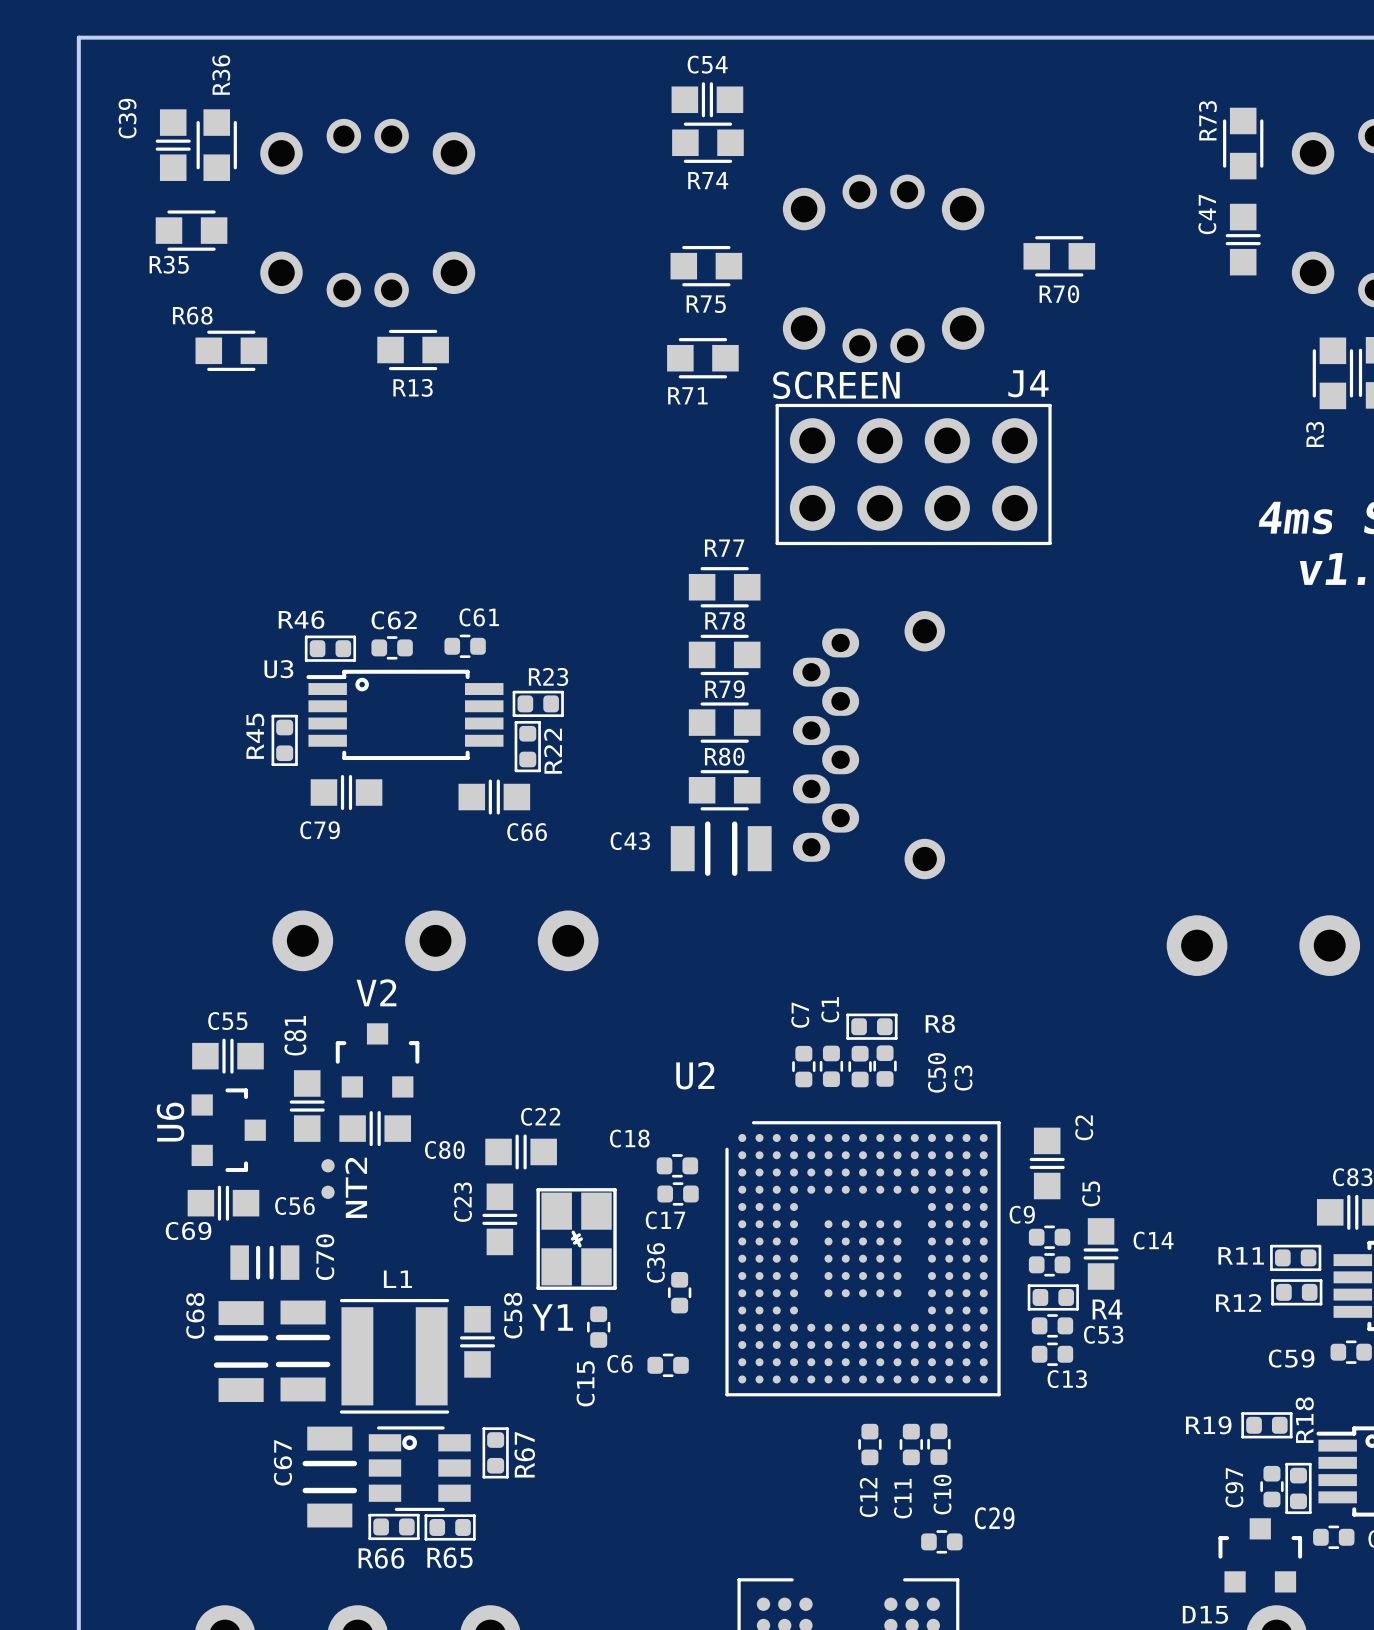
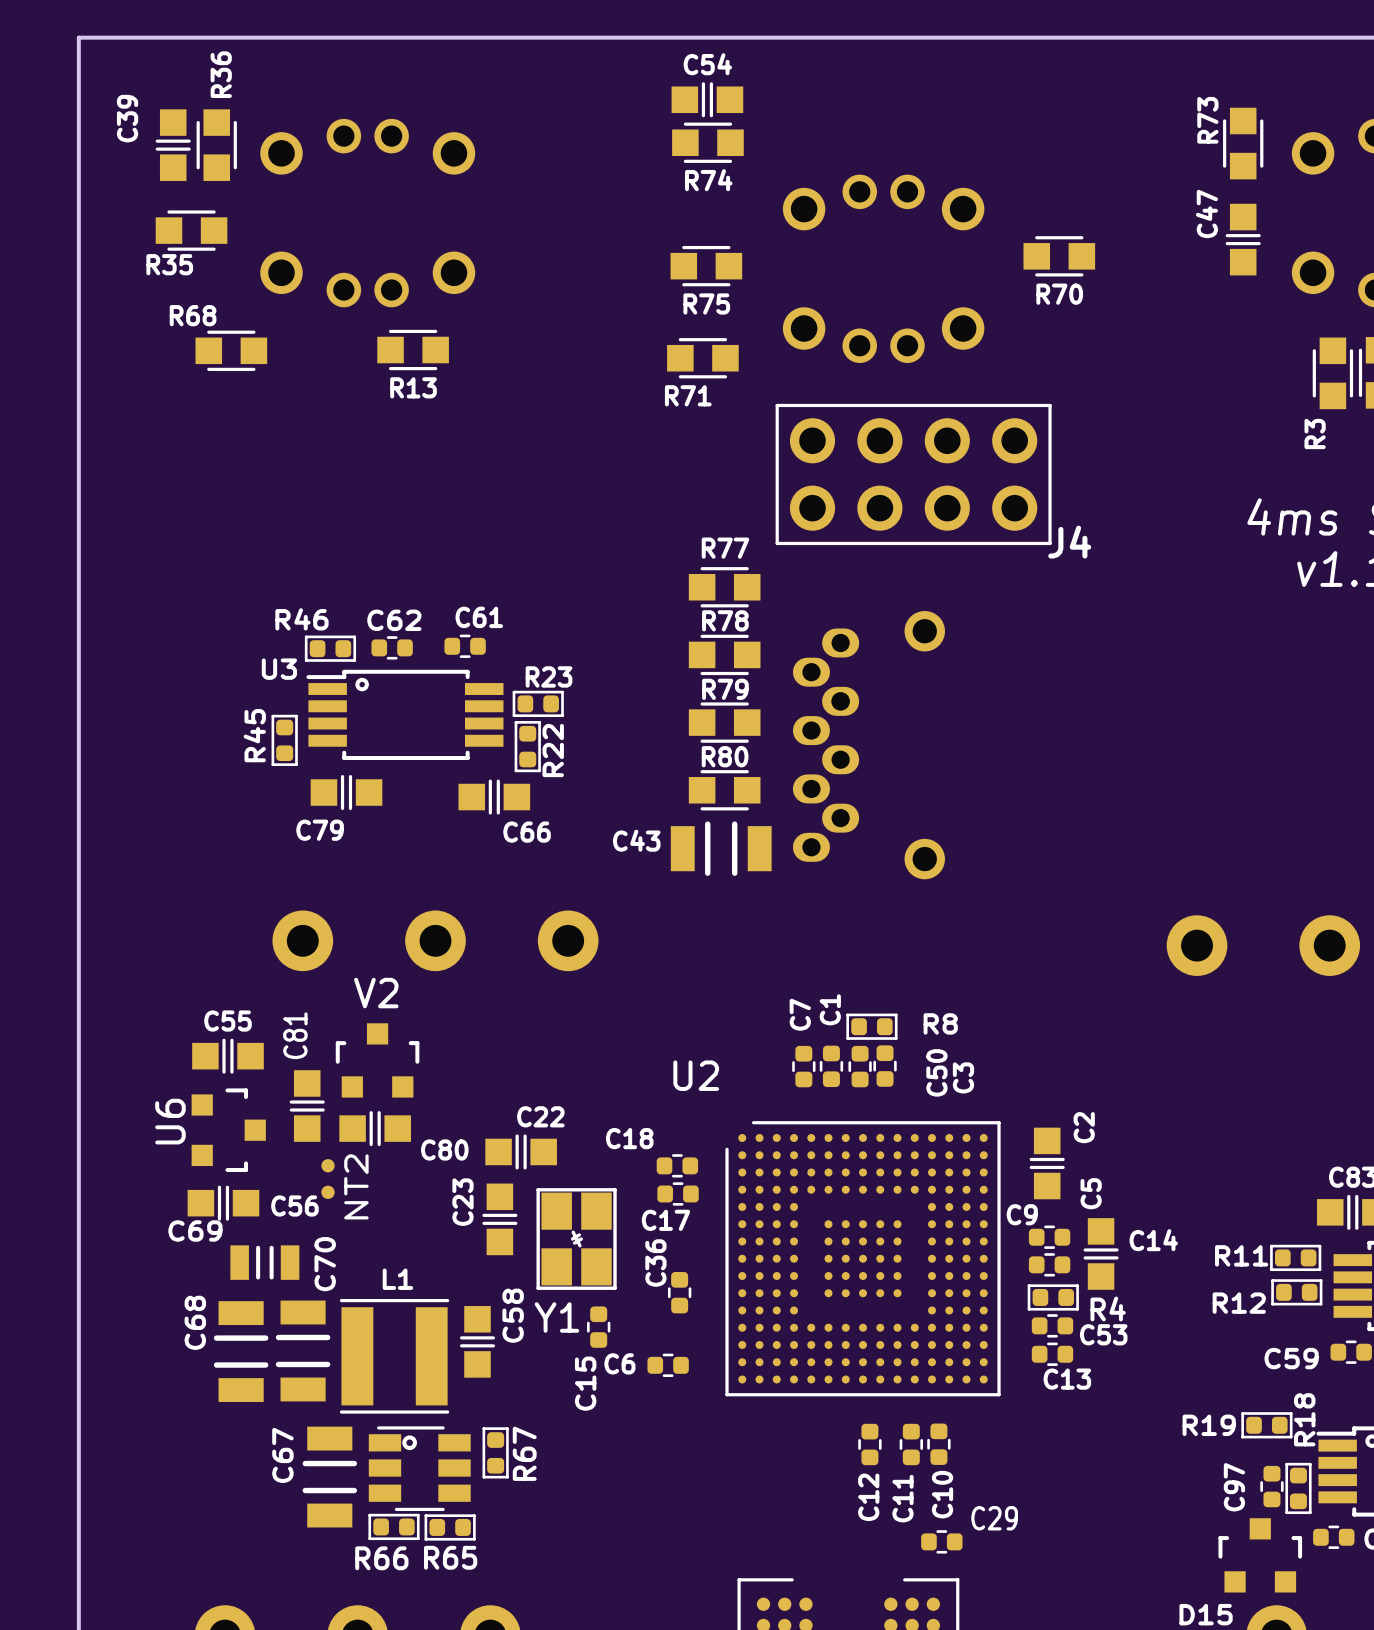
J4 name position: J4 (1028, 383) -> J4 (1069, 542)
text: SCREEN (836, 385) -> none

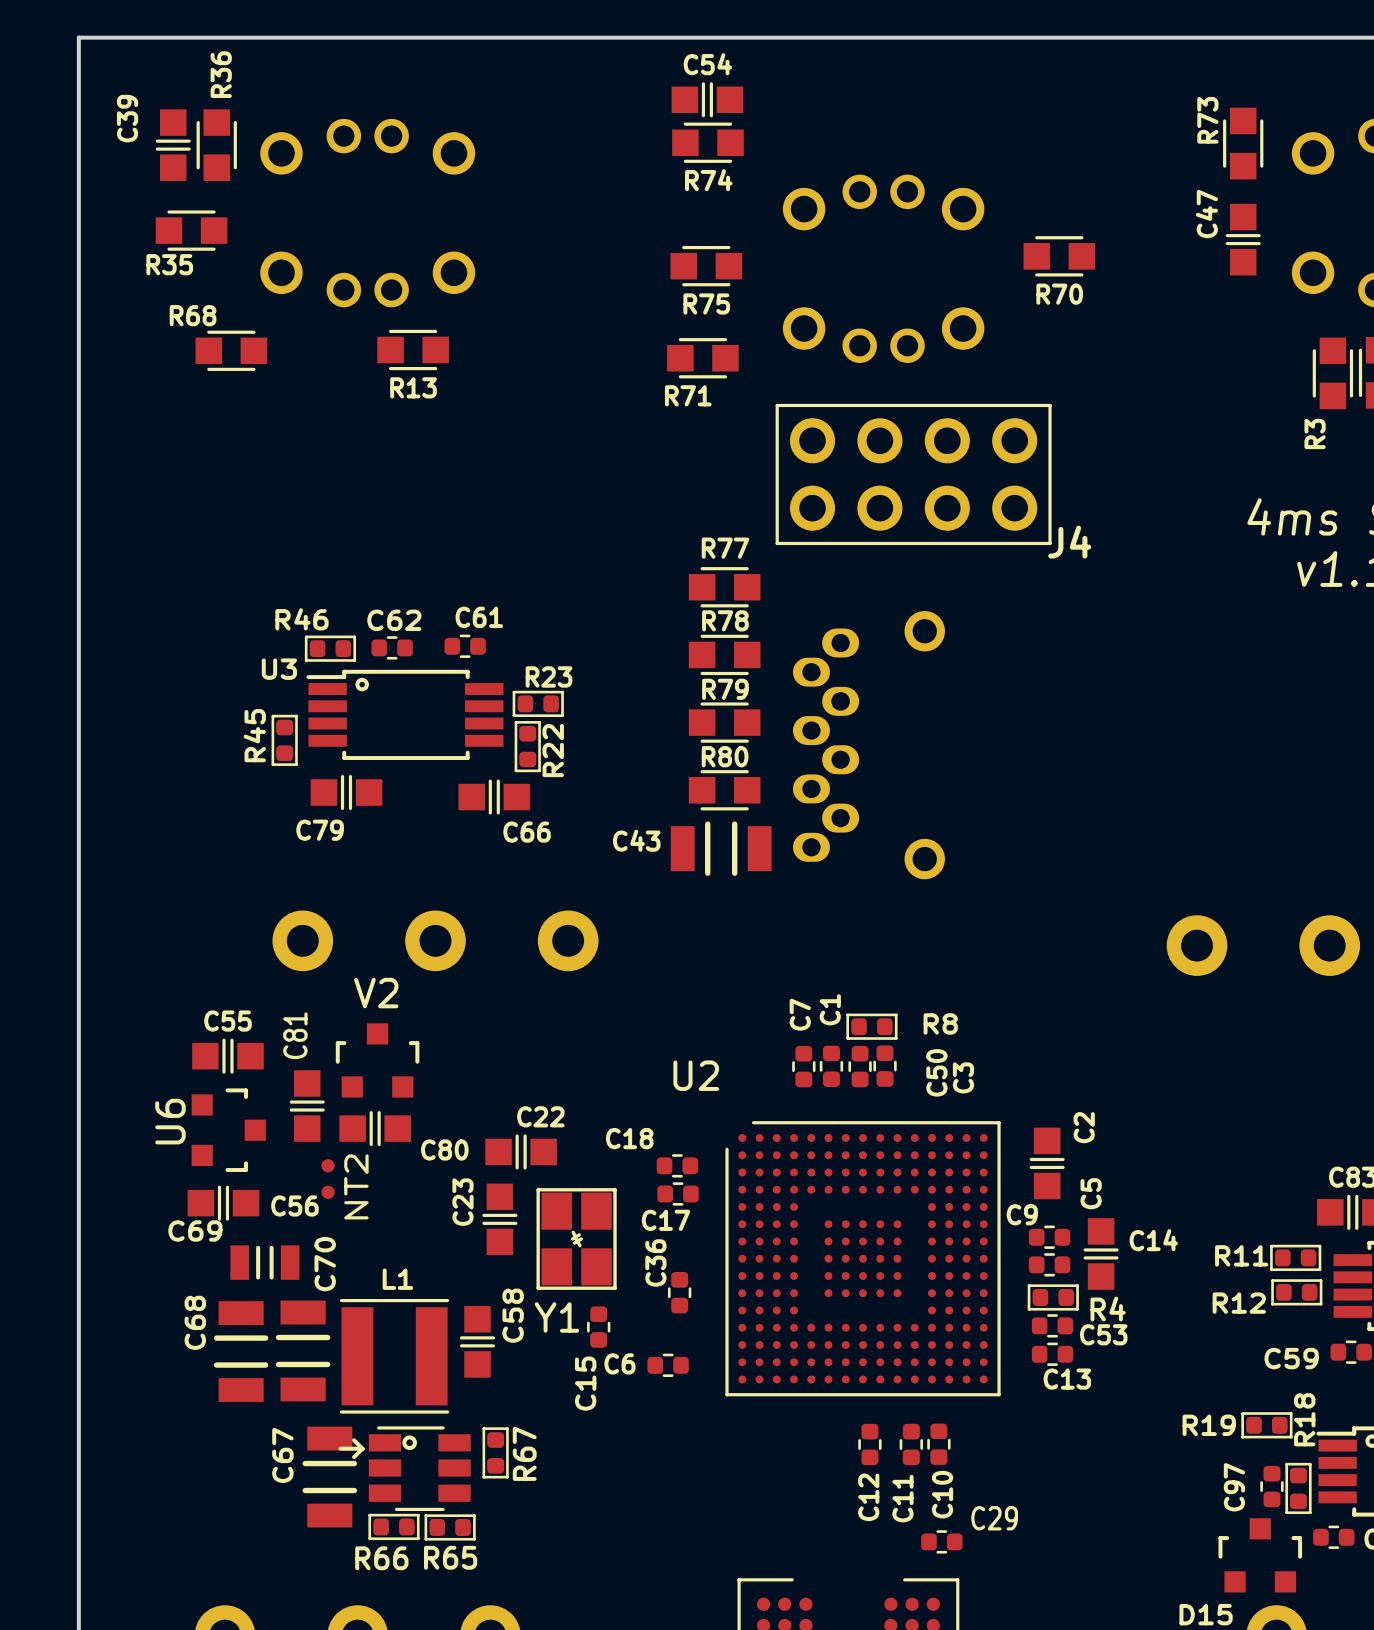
part footprint: [368, 1426, 471, 1512] -> [338, 1426, 471, 1512]

